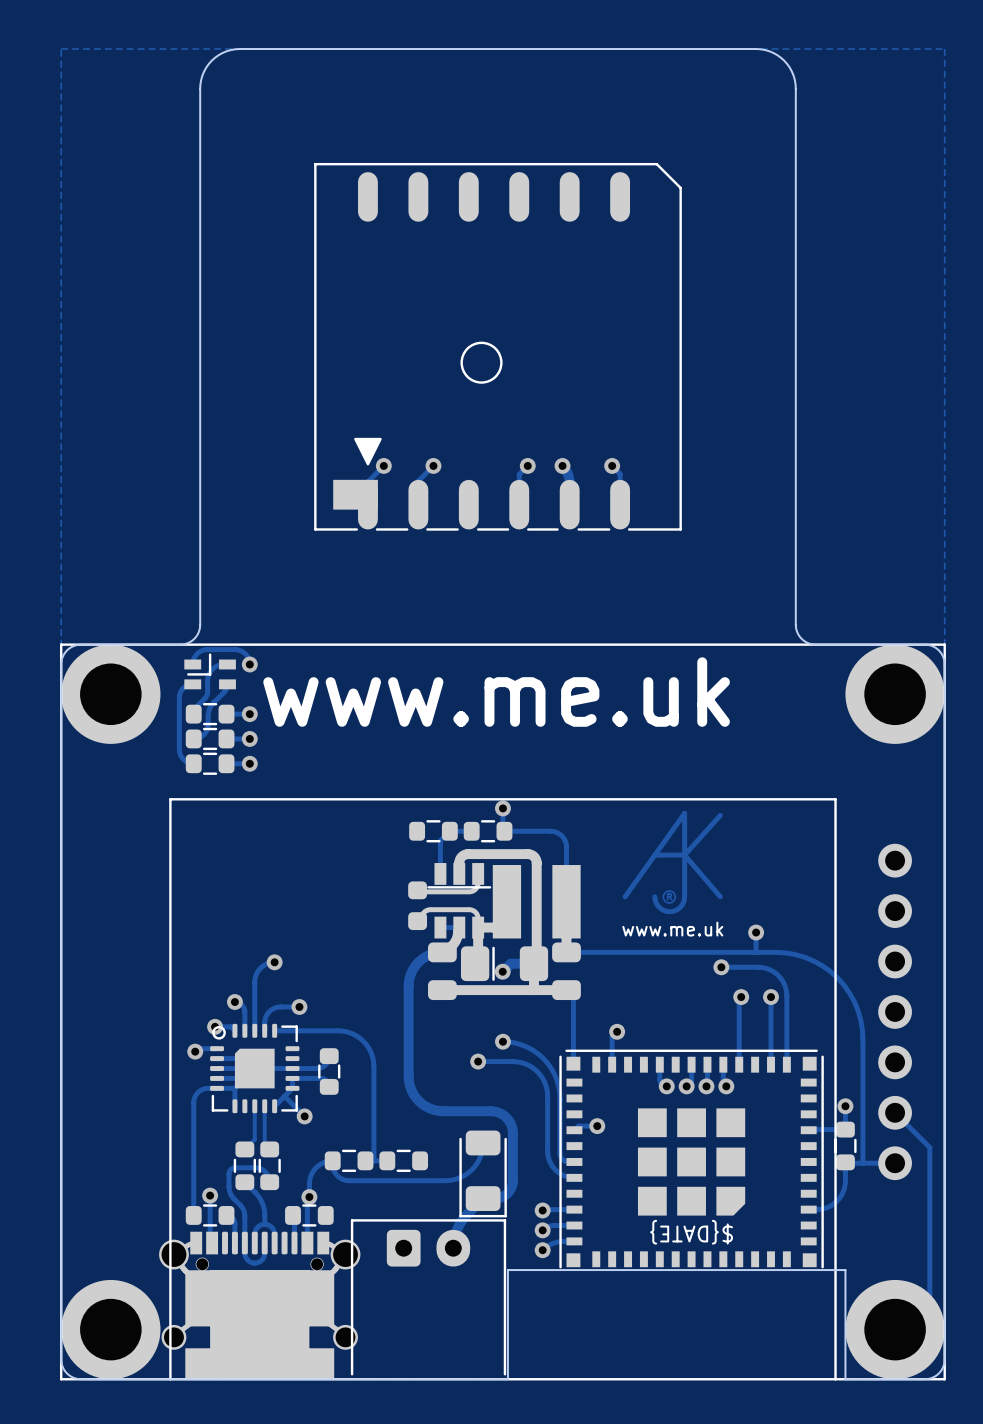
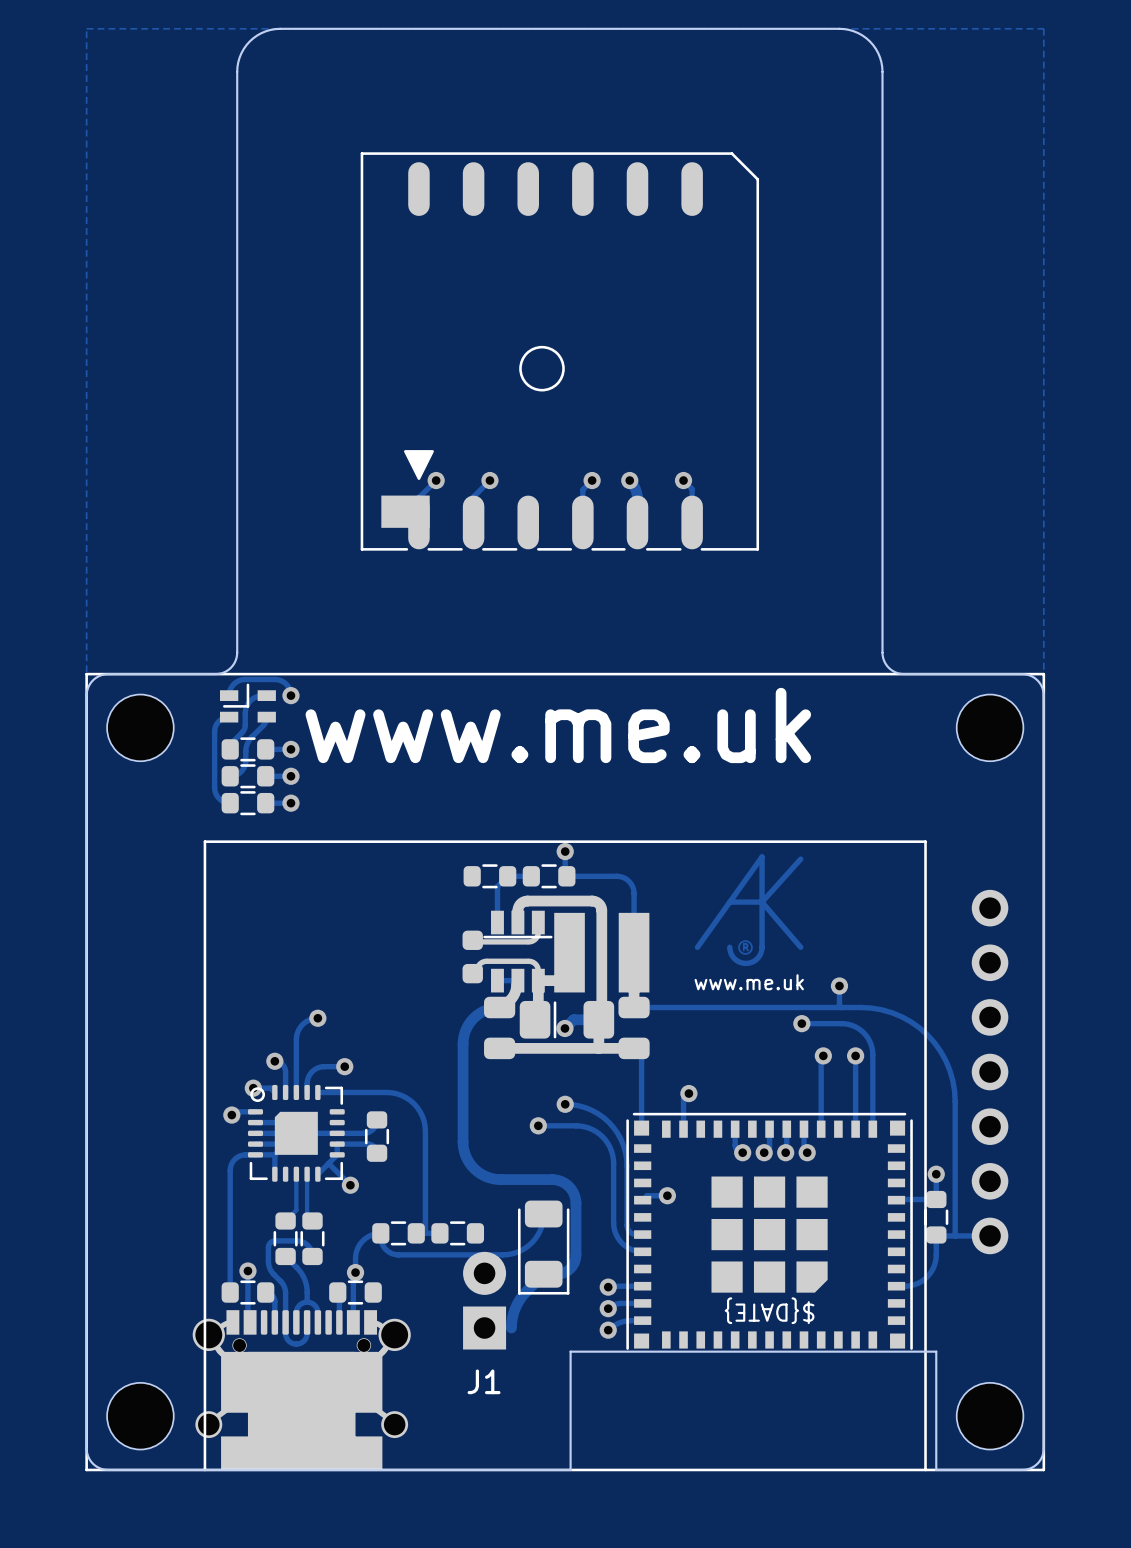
part footprint: [60, 643, 946, 1381] -> [85, 672, 1046, 1472]
track: (895, 1112) (929, 1147) (929, 1294) (895, 1329) -> none
J1: none -> (484, 1300)
part: (428, 1297) -> none

